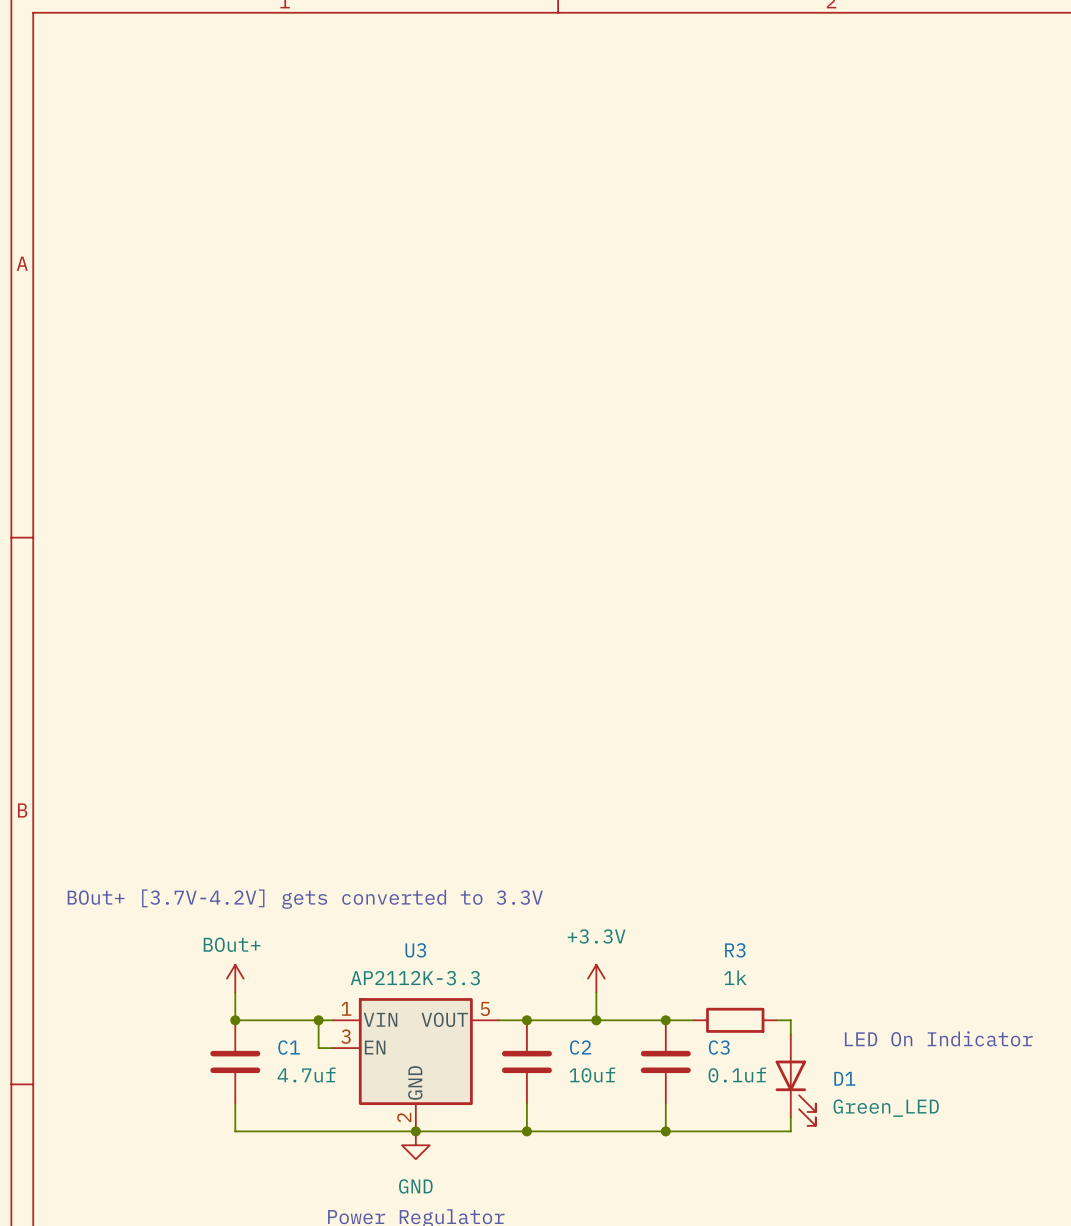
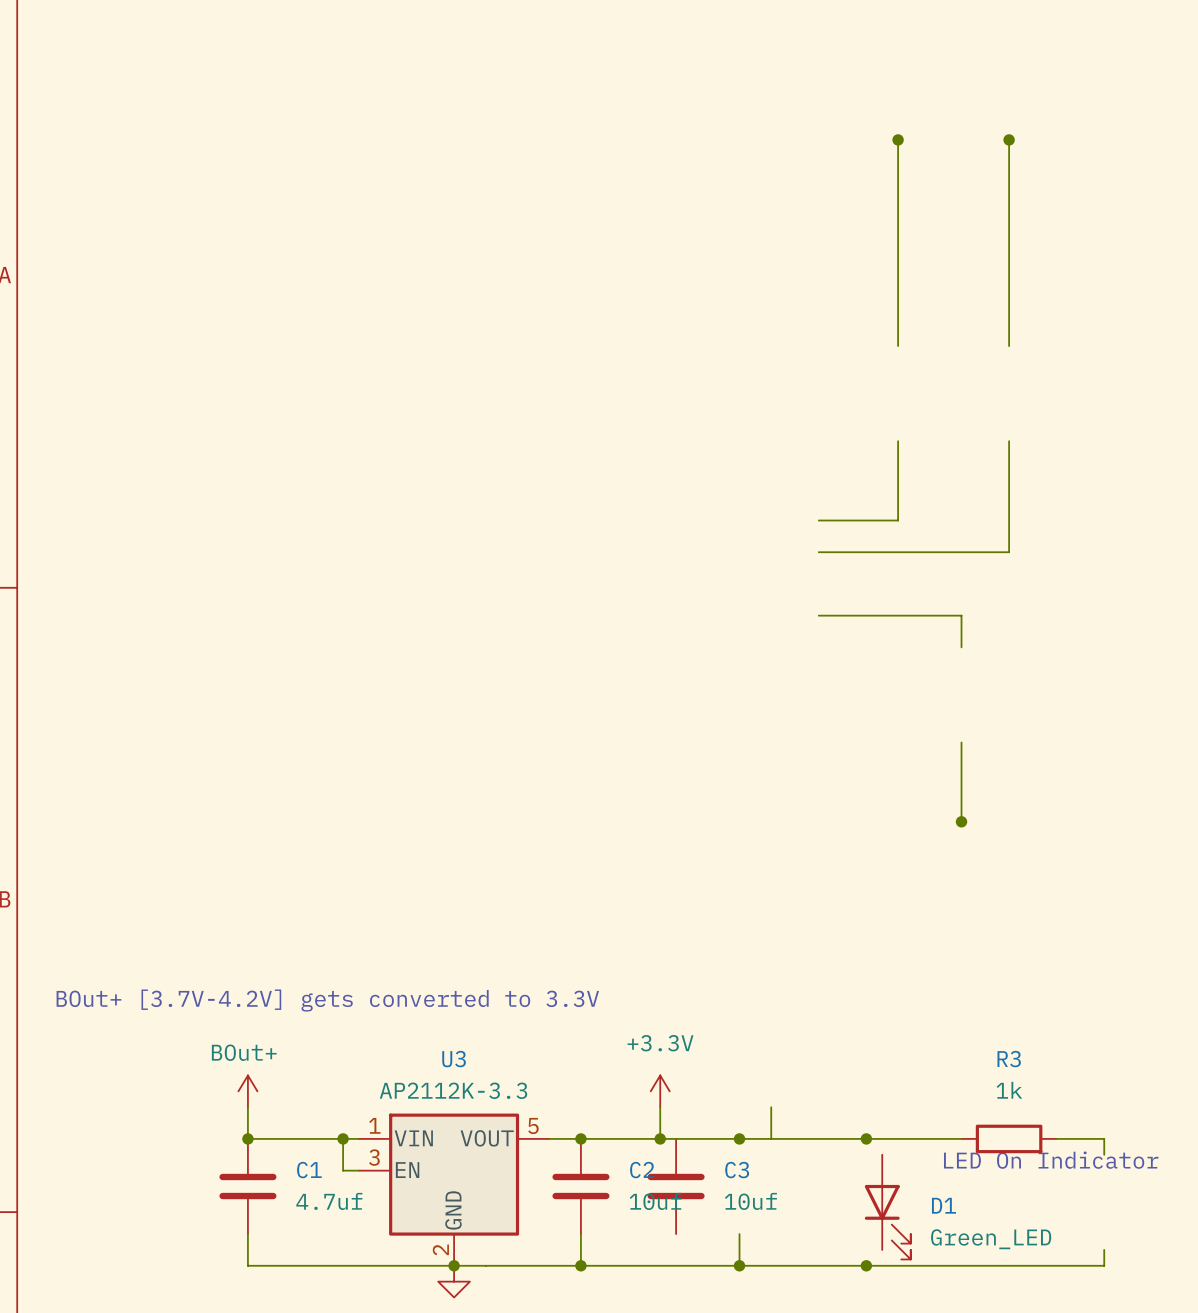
wire: none -> (898, 139) (898, 346)
junction: none -> (898, 139)
wire: none -> (1009, 139) (1009, 346)
junction: none -> (1009, 139)
wire: none -> (898, 441) (898, 520) (818, 520)
wire: none -> (1009, 441) (1009, 552) (818, 552)
wire: none -> (818, 615) (961, 615) (961, 647)
wire: none -> (961, 742) (961, 821)
junction: none -> (961, 821)
wire: none -> (771, 1107) (771, 1138) (866, 1138)
R3 position: (735, 1020) -> (1009, 1138)
junction: none -> (866, 1138)
wire: (790, 1020) (790, 1034) -> (882, 1138) (961, 1138)
wire: none -> (1056, 1138) (1104, 1138) (1104, 1154)
C3 position: (665, 1061) -> (676, 1186)
C3 value: 0.1uf (737, 1075) -> 10uf (750, 1201)
wire: (790, 1117) (790, 1131) -> (1104, 1249) (1104, 1265) (882, 1265)
junction: none -> (866, 1265)

